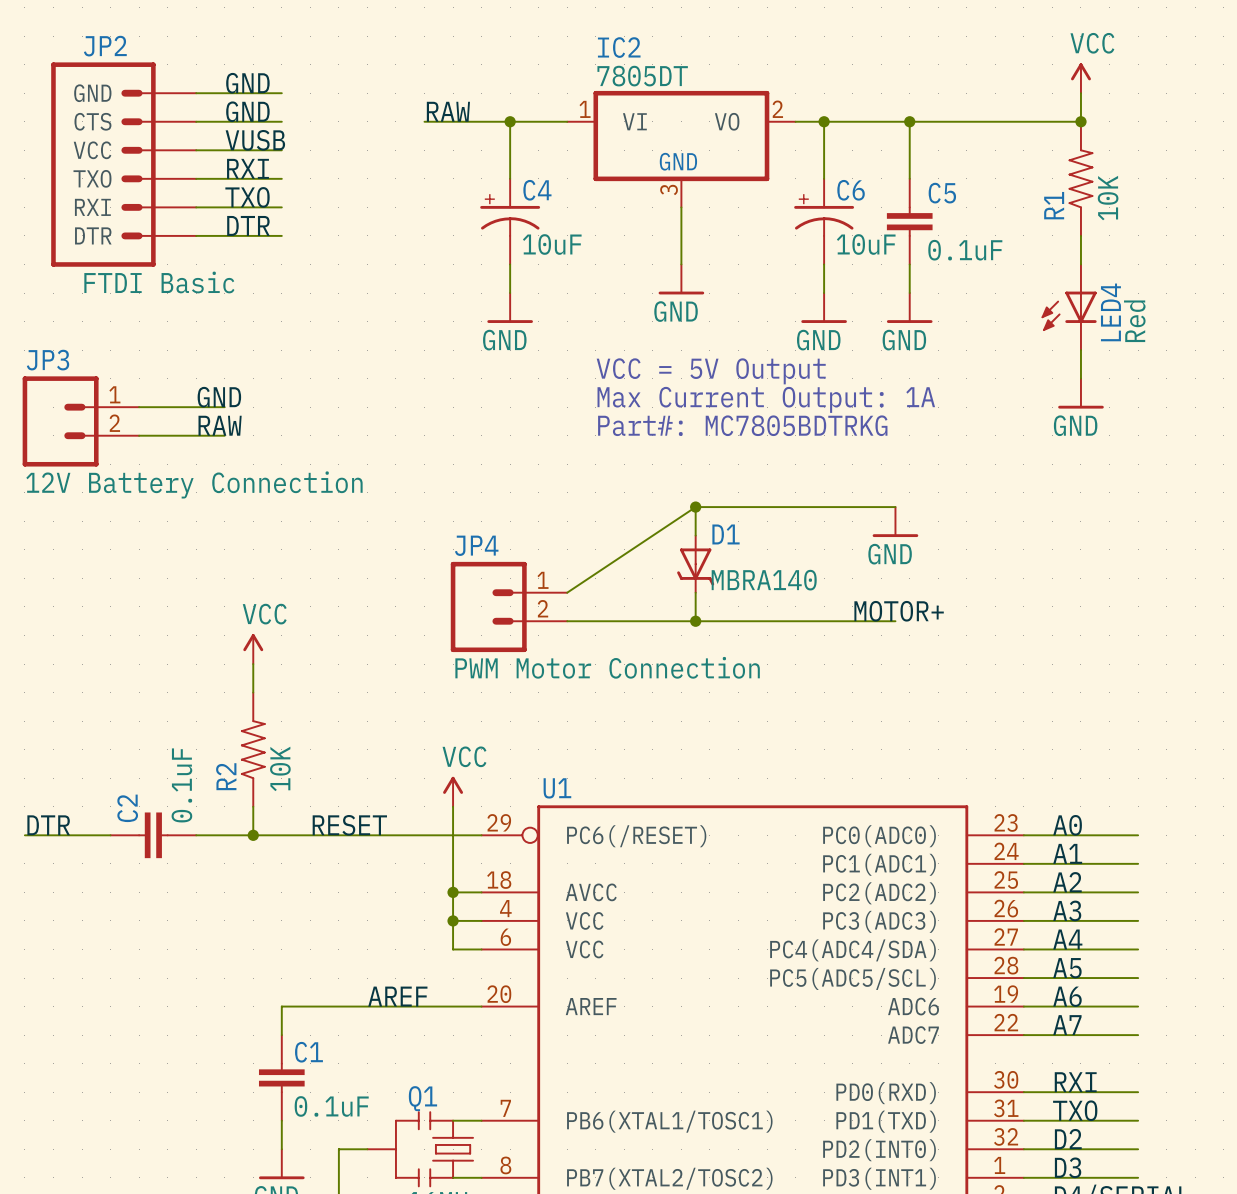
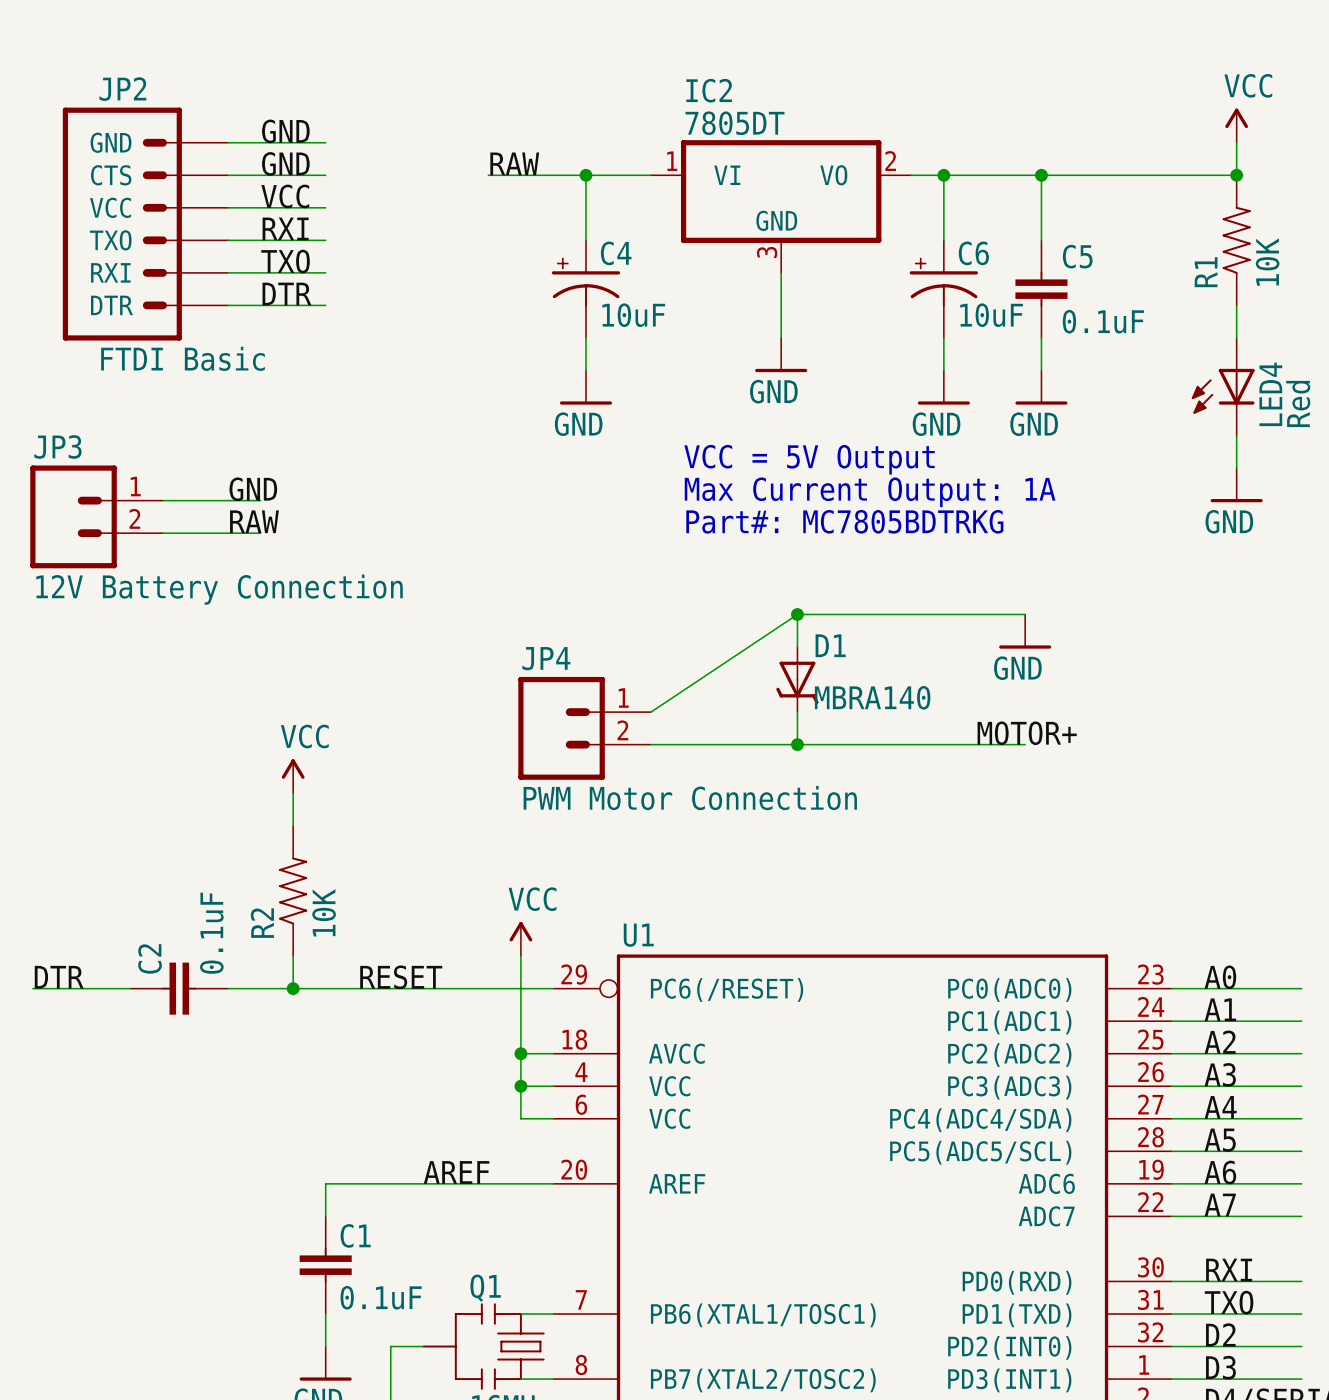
label: VUSB (255, 140) -> VCC (285, 196)

